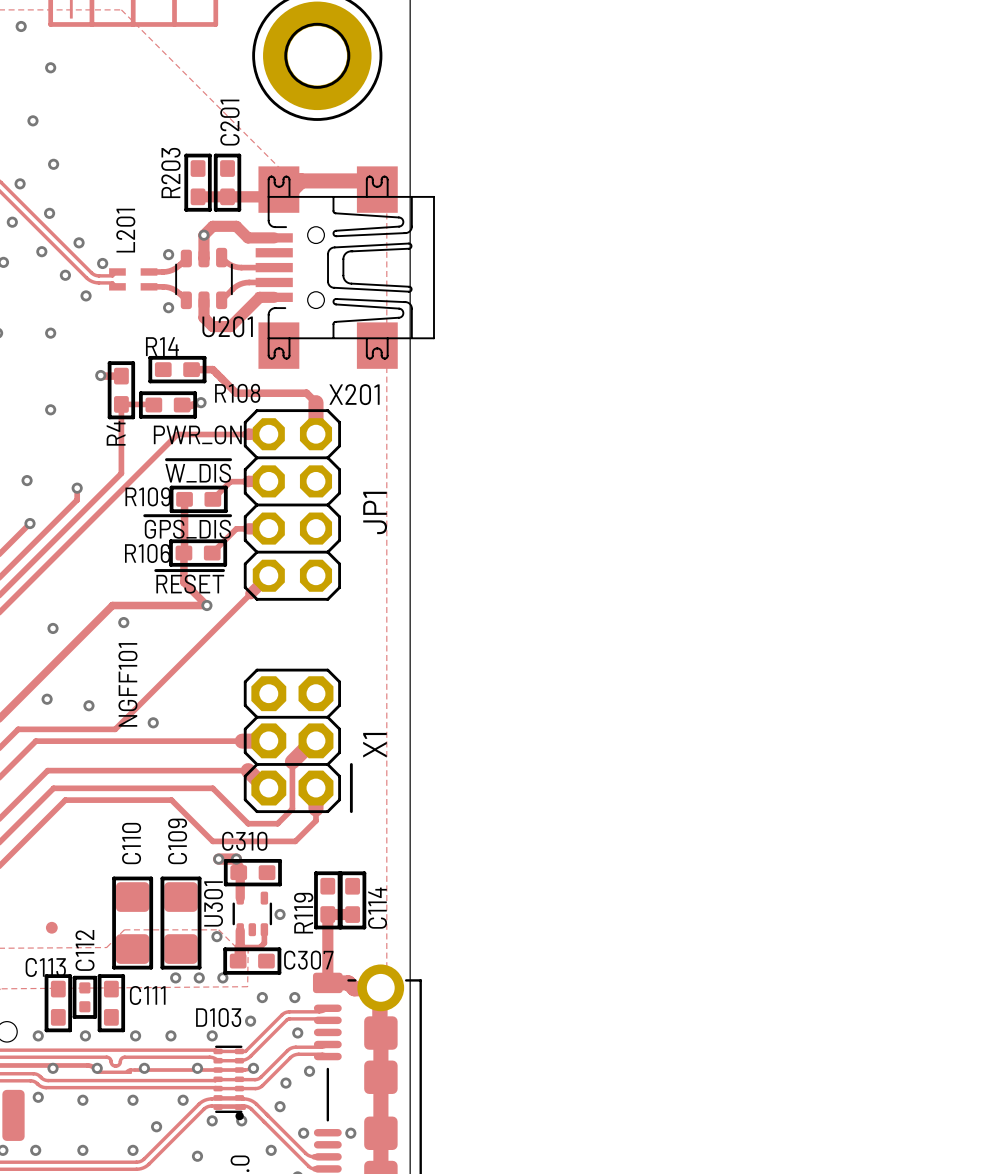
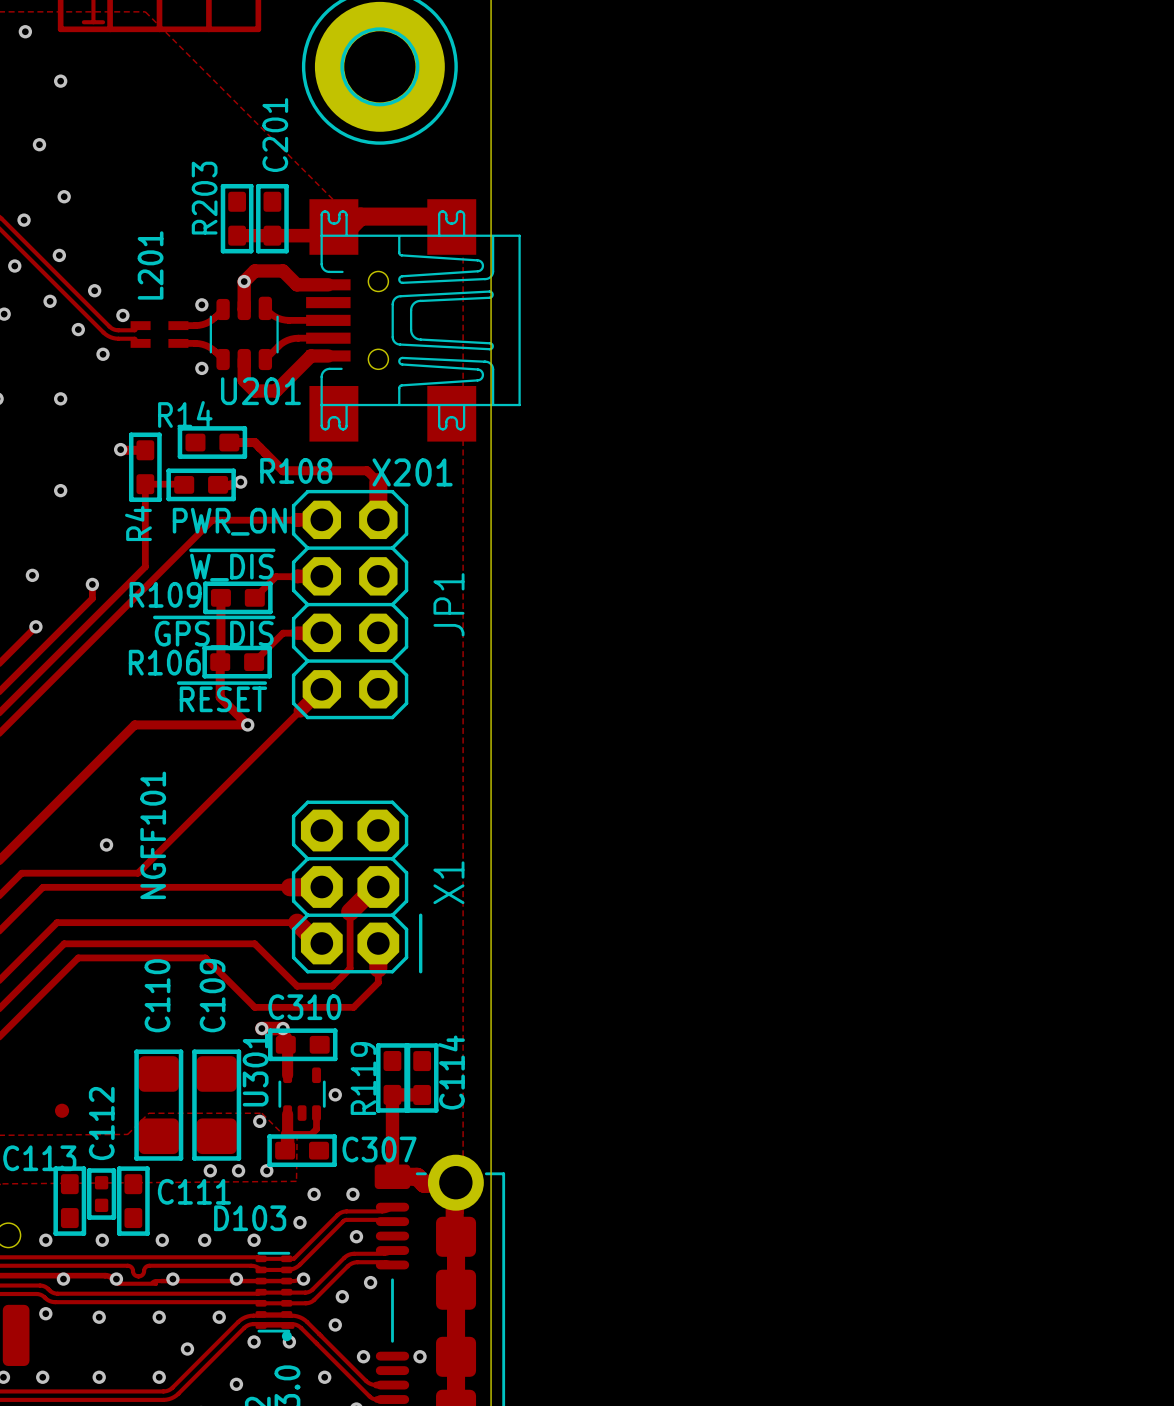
via: (123, 622) -> none
via: (53, 628) -> none
via: (47, 699) -> none
via: (153, 722) -> none

